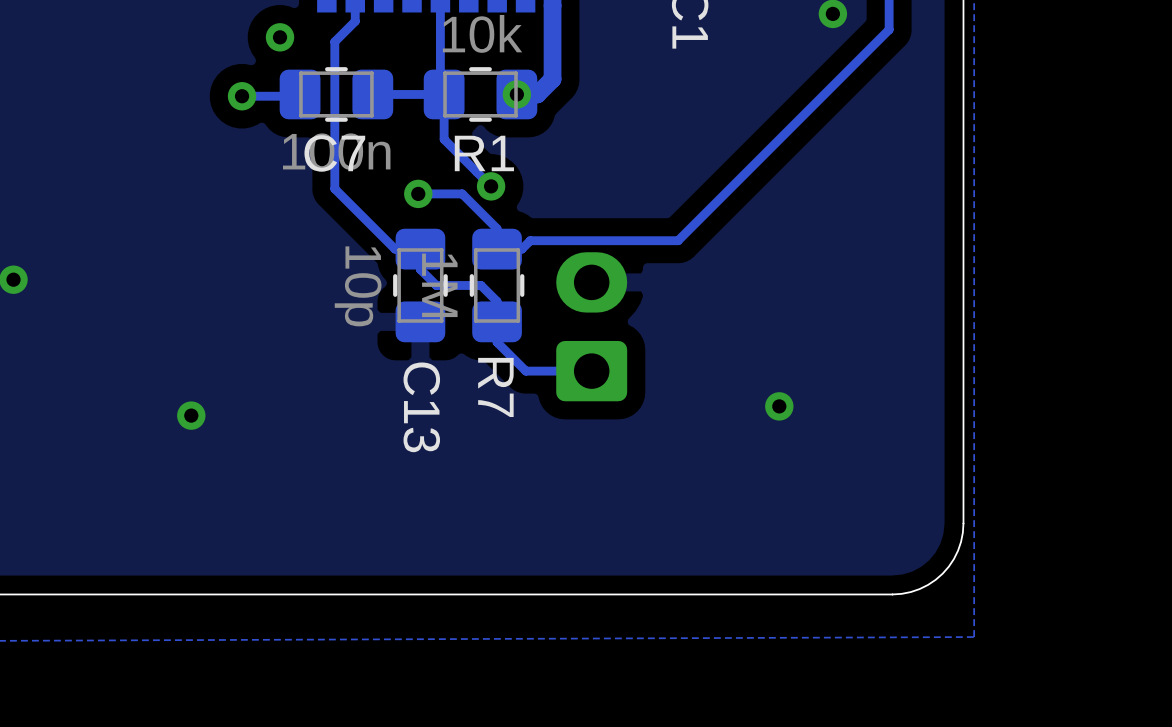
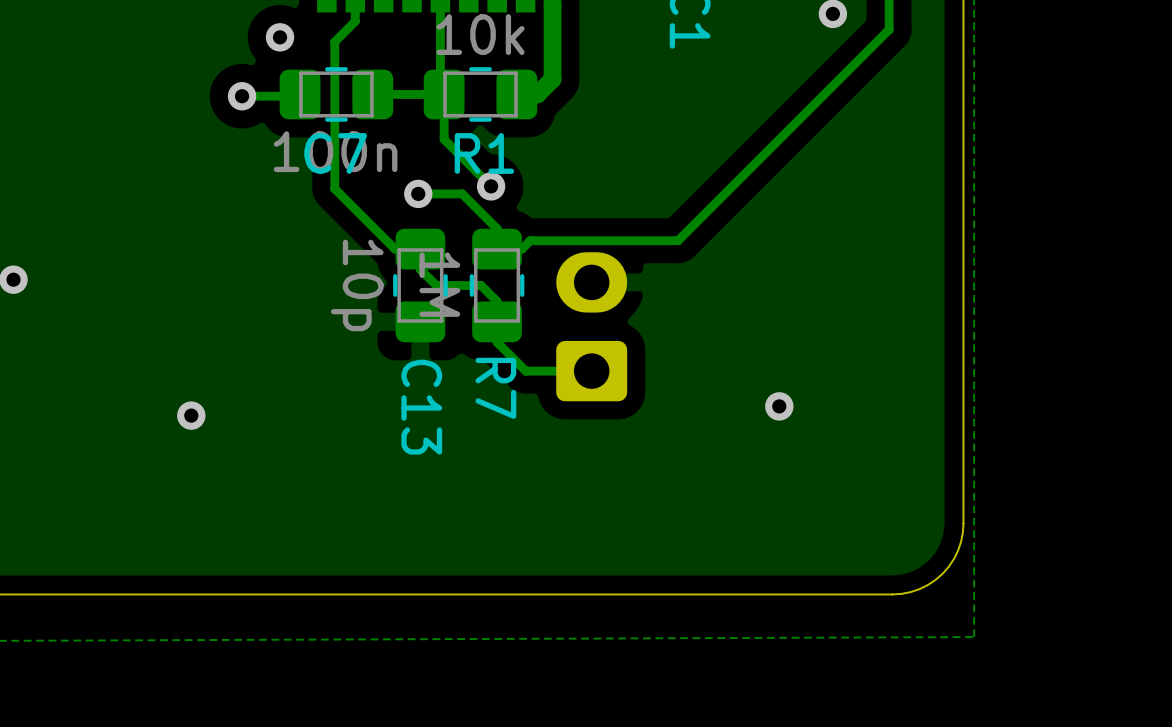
via: (516, 94) -> none

